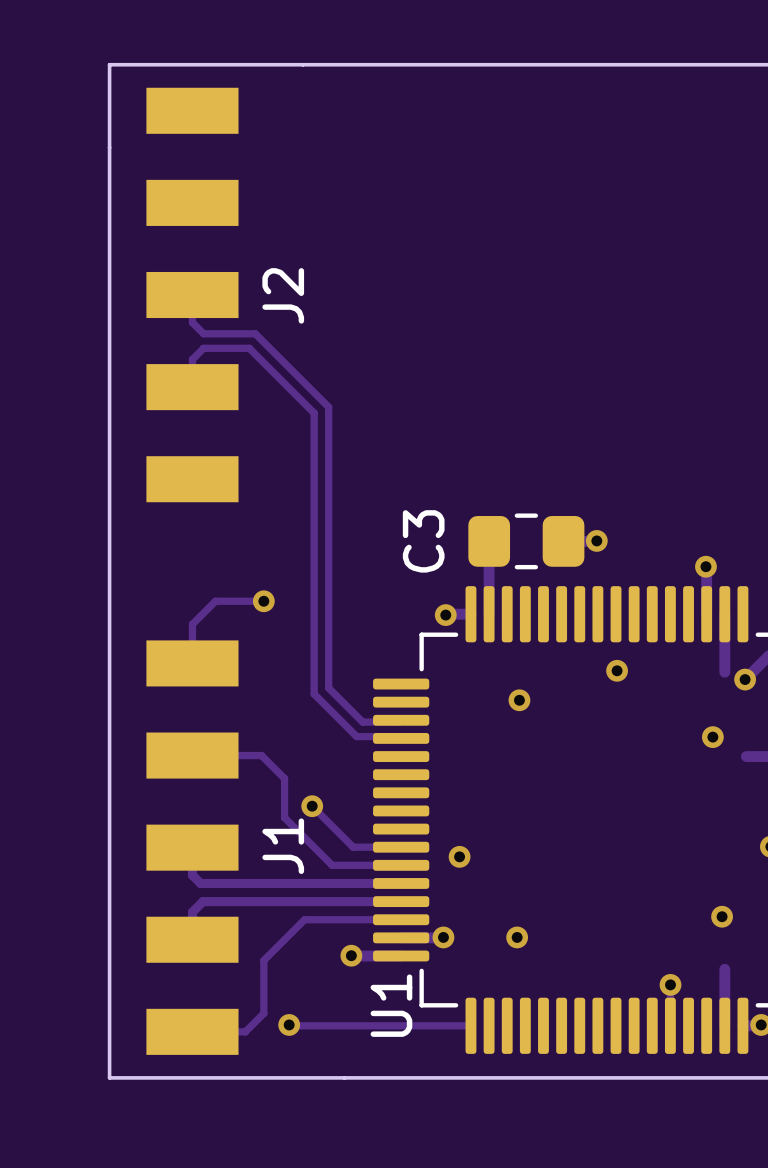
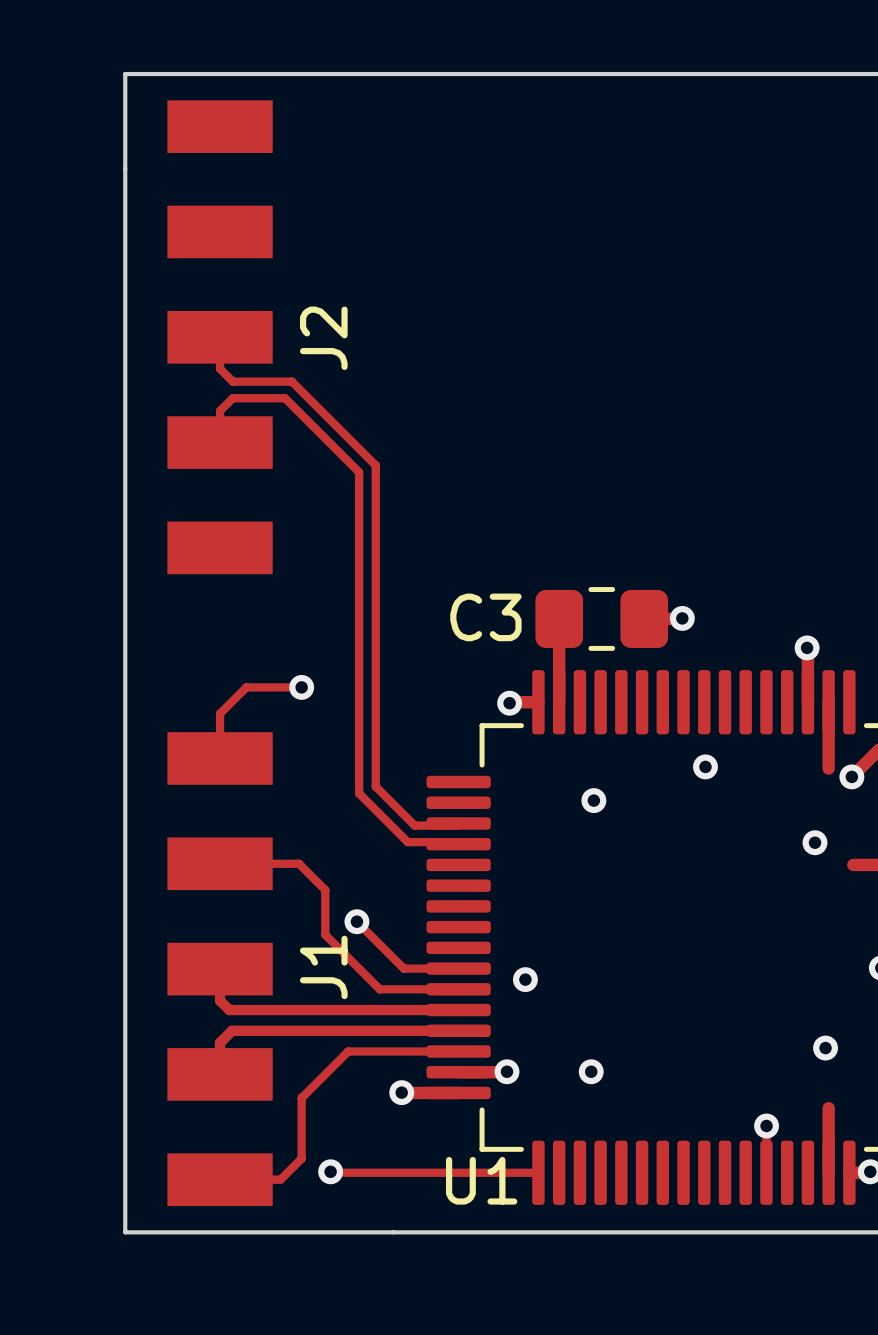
C3 name rotation: 0° (423, 541) -> 90° clockwise (485, 617)
U1 name rotation: 0° (391, 1005) -> 90° clockwise (481, 1180)

